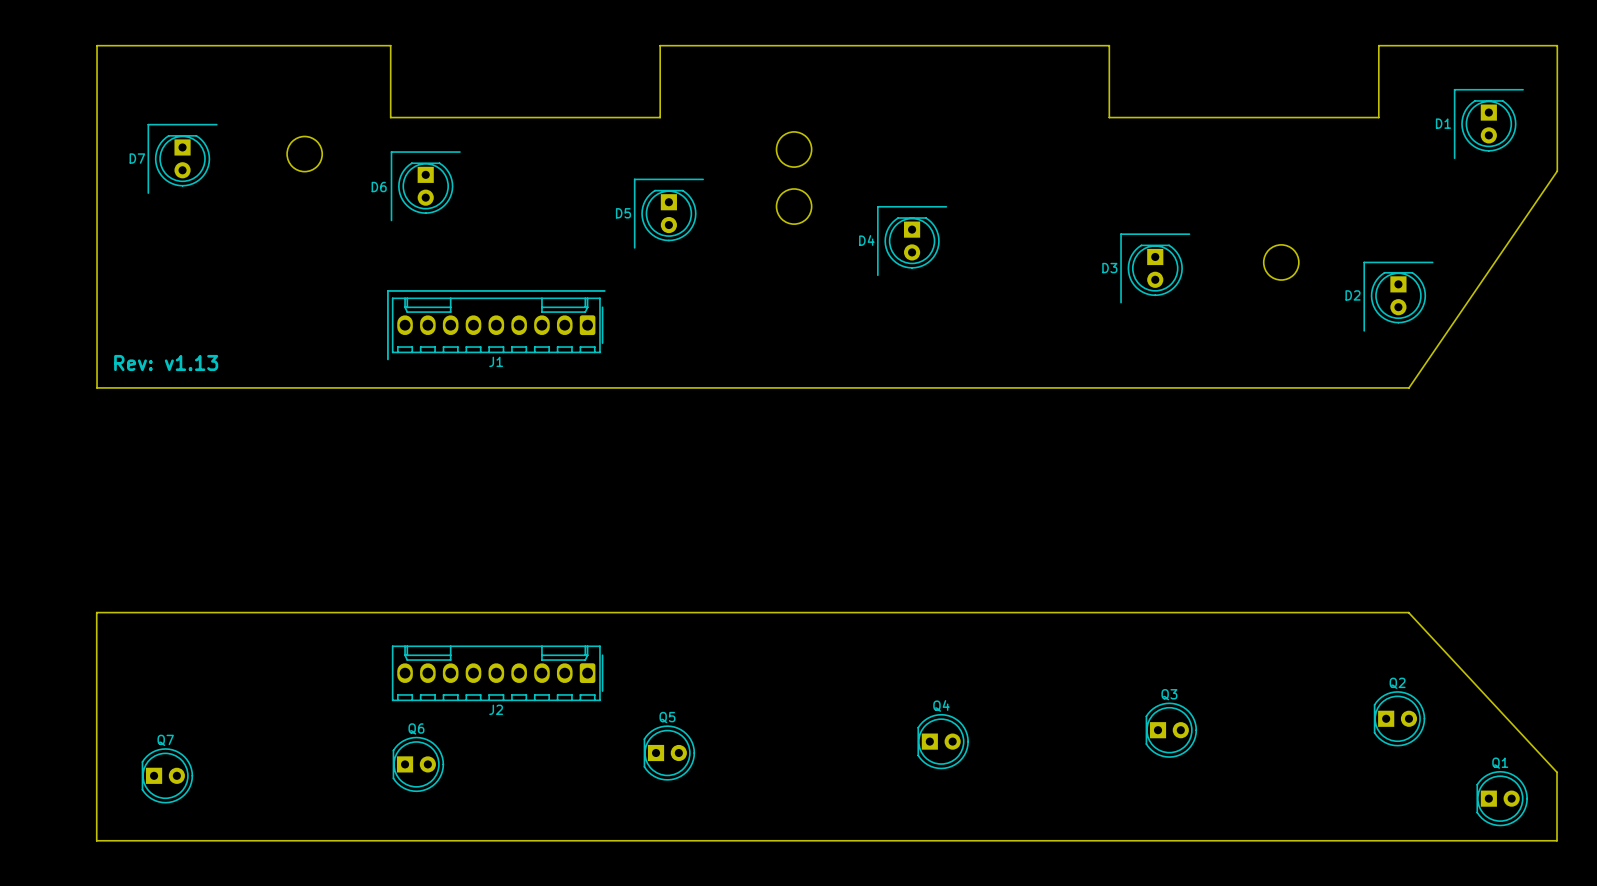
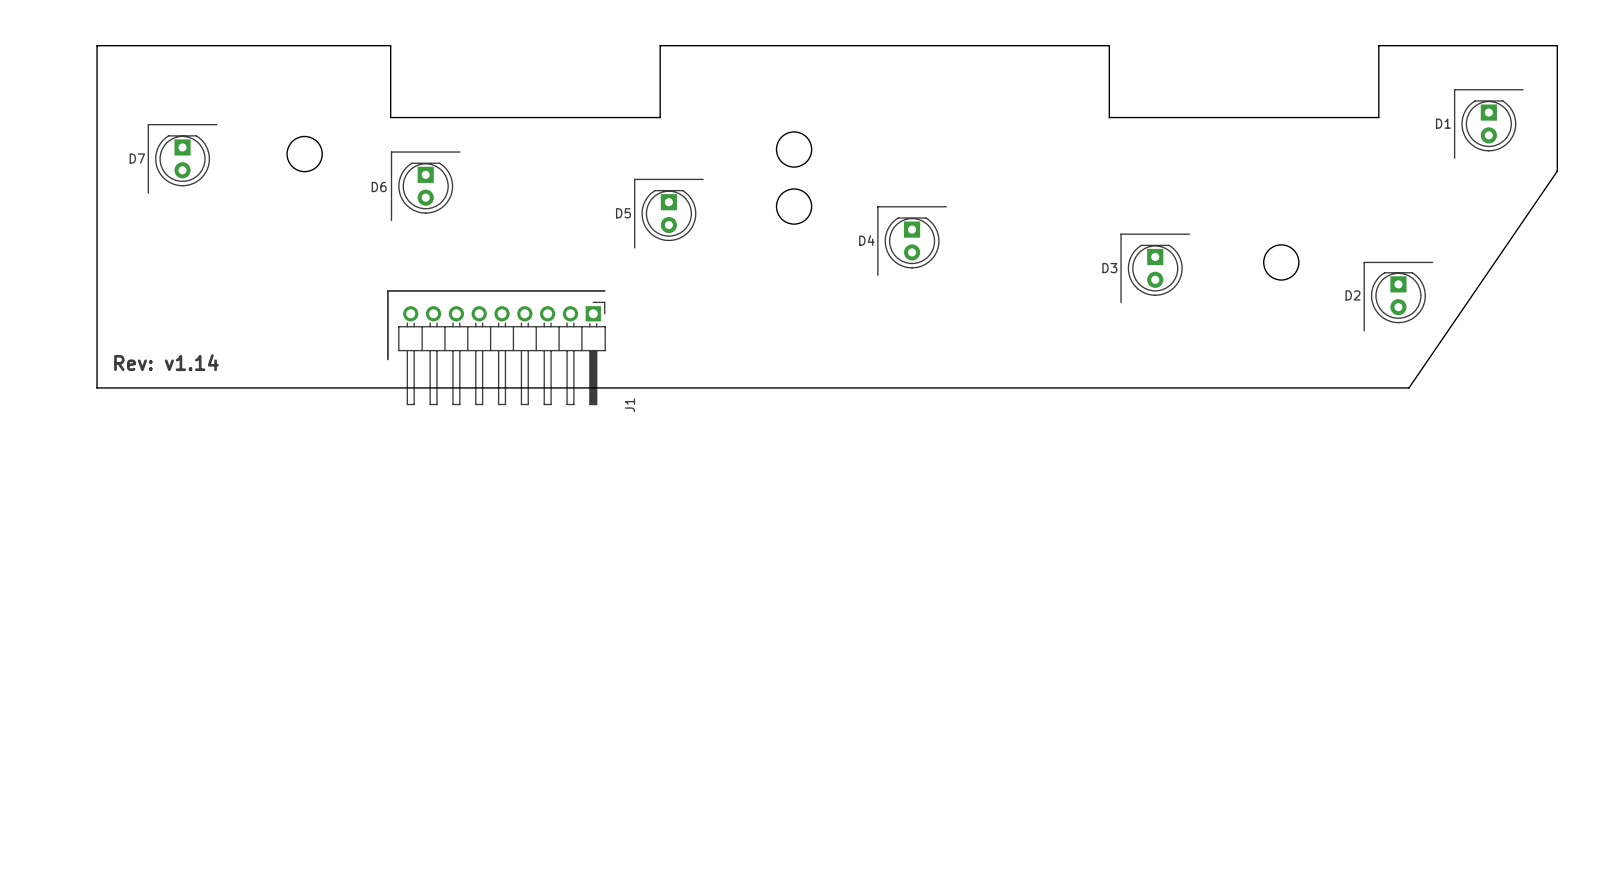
J1 footprint: [392, 297, 604, 353] -> [398, 301, 606, 406]
J1 name position: J1 (496, 361) -> J1 (629, 405)
text: Rev: v1.13 (166, 363) -> Rev: v1.14 (166, 362)
board edge: (96, 612) (1408, 612) (1557, 772) (1557, 840) (96, 840) (96, 612) -> none
J2: (497, 673) -> none
Q2: (1399, 718) -> none
Q3: (1171, 730) -> none
Q4: (943, 741) -> none
Q5: (669, 753) -> none
Q6: (418, 764) -> none
Q7: (167, 775) -> none
Q1: (1502, 798) -> none

